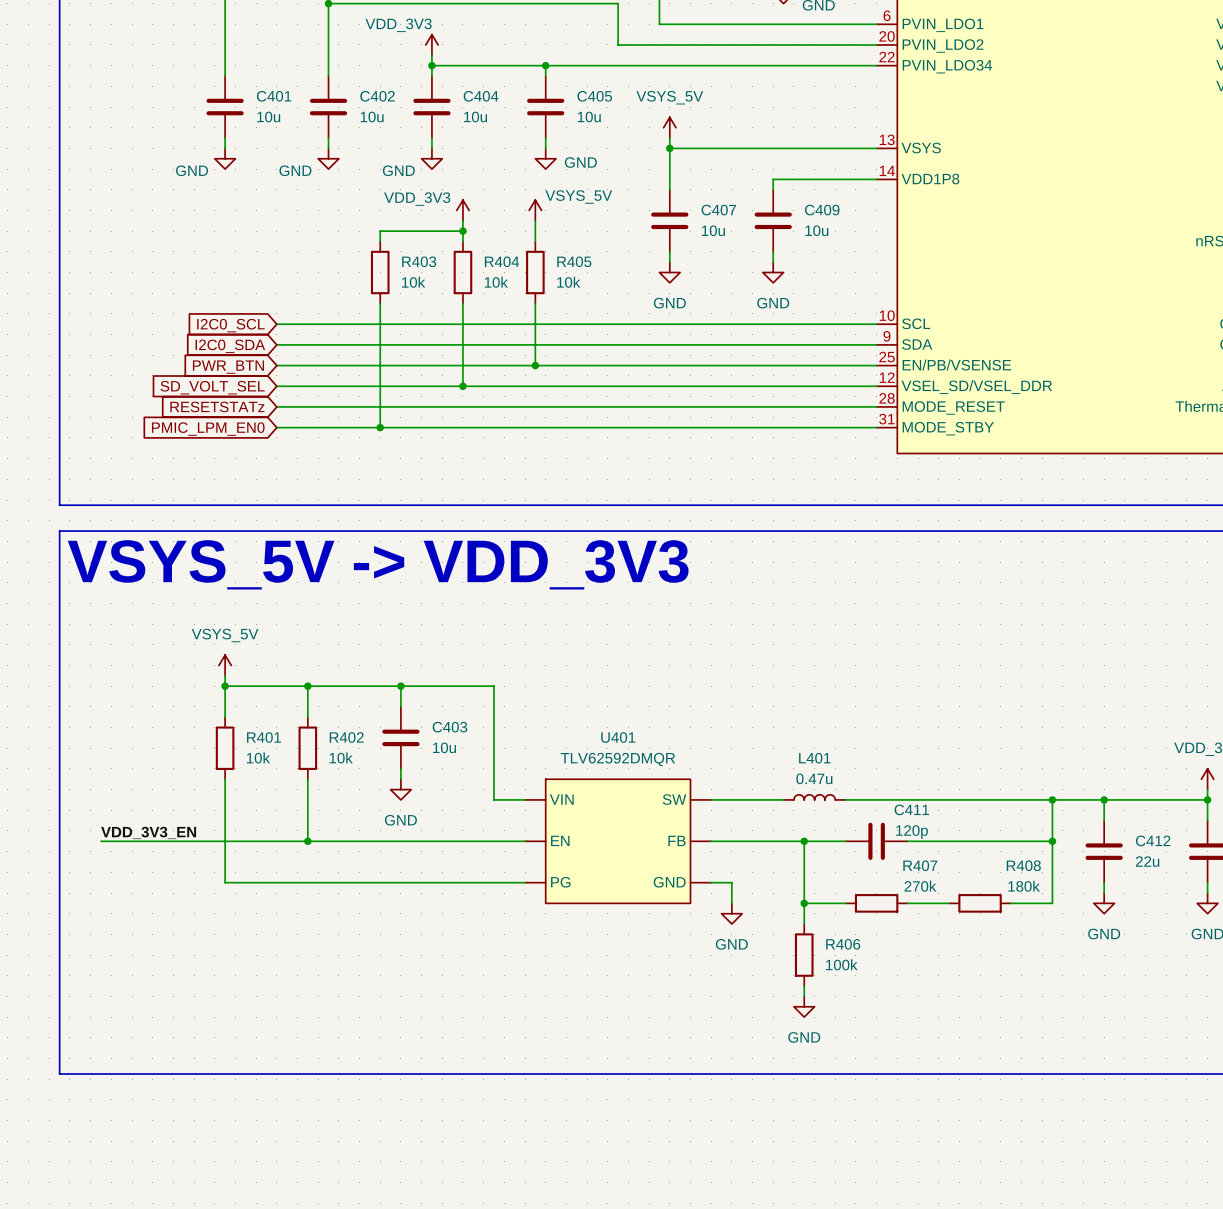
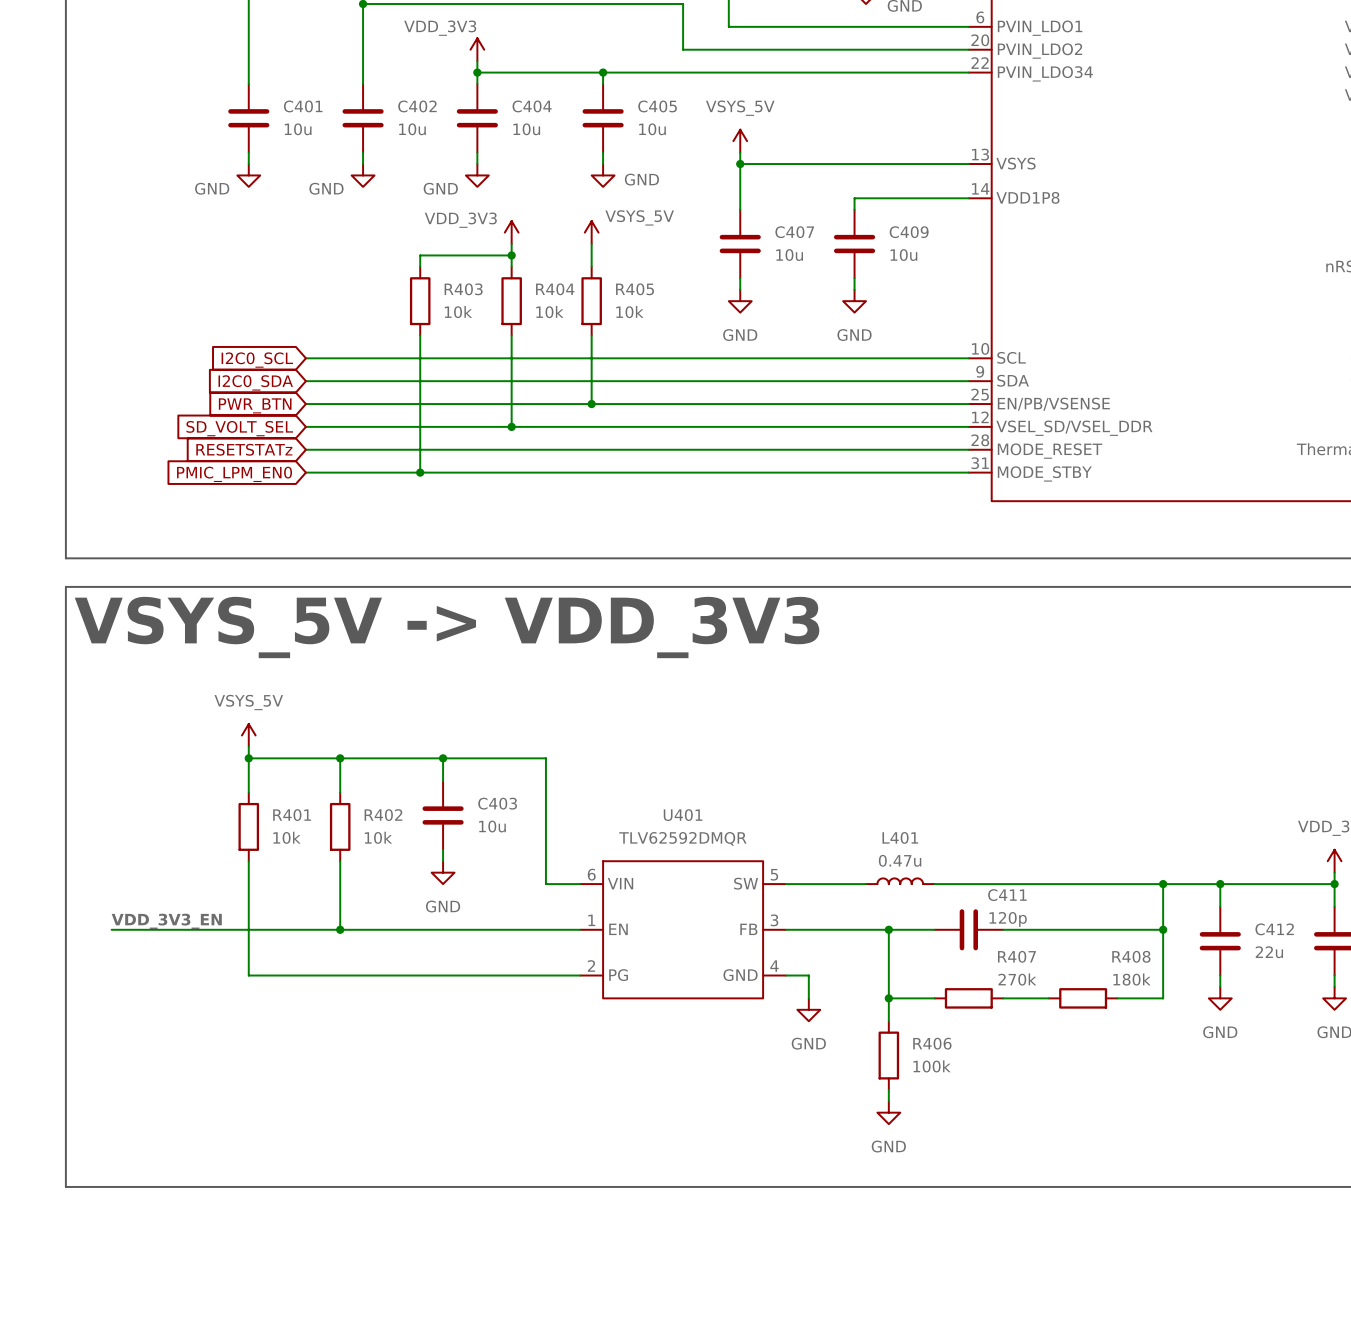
U401 pin number: none -> 6 (591, 874)
U401 pin number: none -> 5 (774, 874)
U401 pin number: none -> 1 (591, 920)
U401 pin number: none -> 3 (774, 920)
U401 pin number: none -> 2 (591, 965)
U401 pin number: none -> 4 (774, 966)

